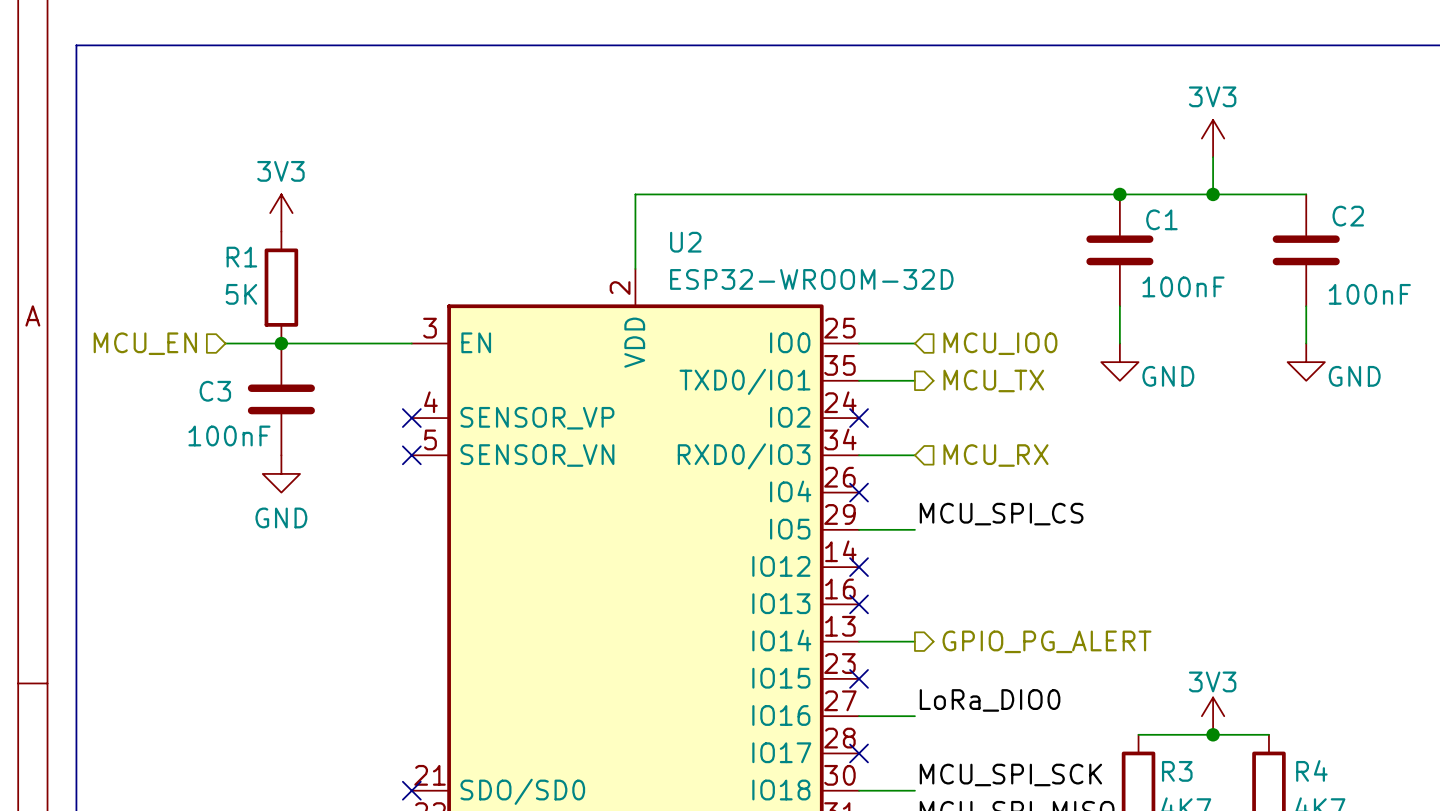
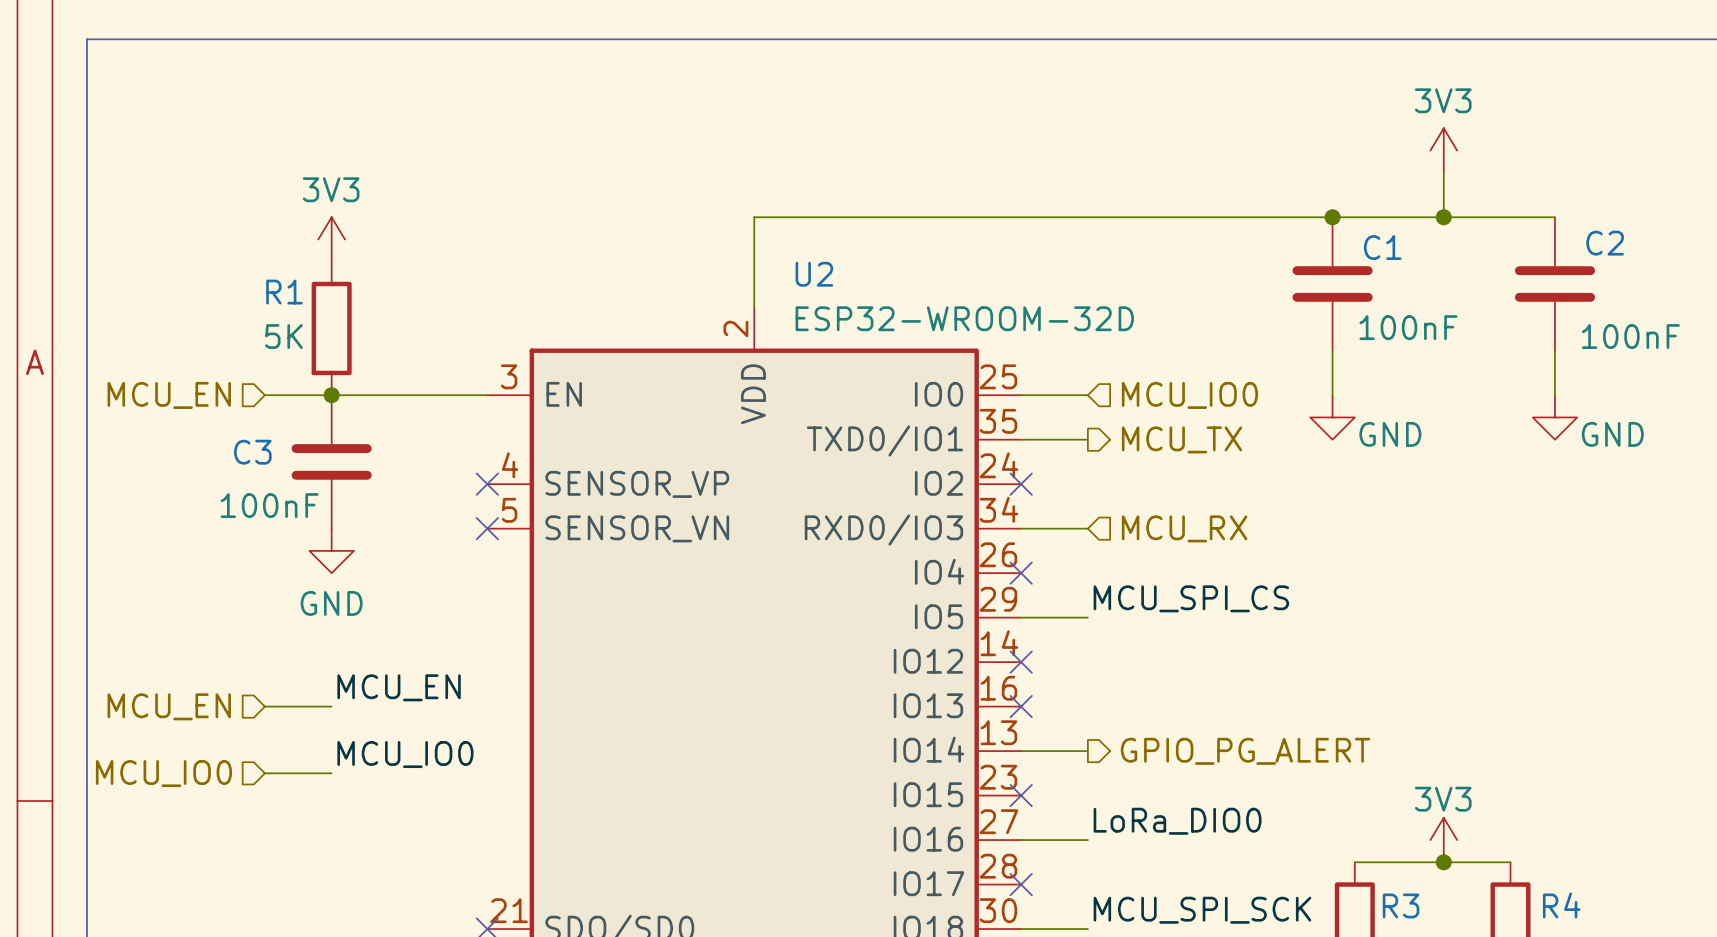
label: none -> MCU_EN (399, 687)
hierarchical label: none -> MCU_EN (169, 706)
wire: none -> (264, 706) (331, 706)
label: none -> MCU_IO0 (405, 754)
hierarchical label: none -> MCU_IO0 (163, 773)
wire: none -> (264, 773) (331, 773)

